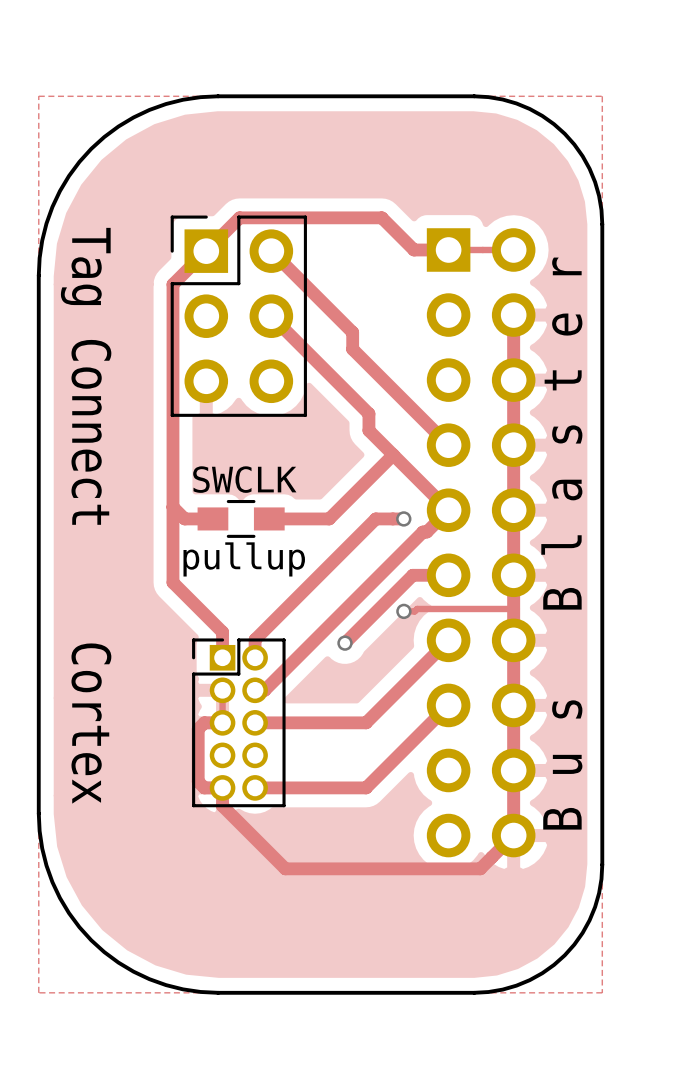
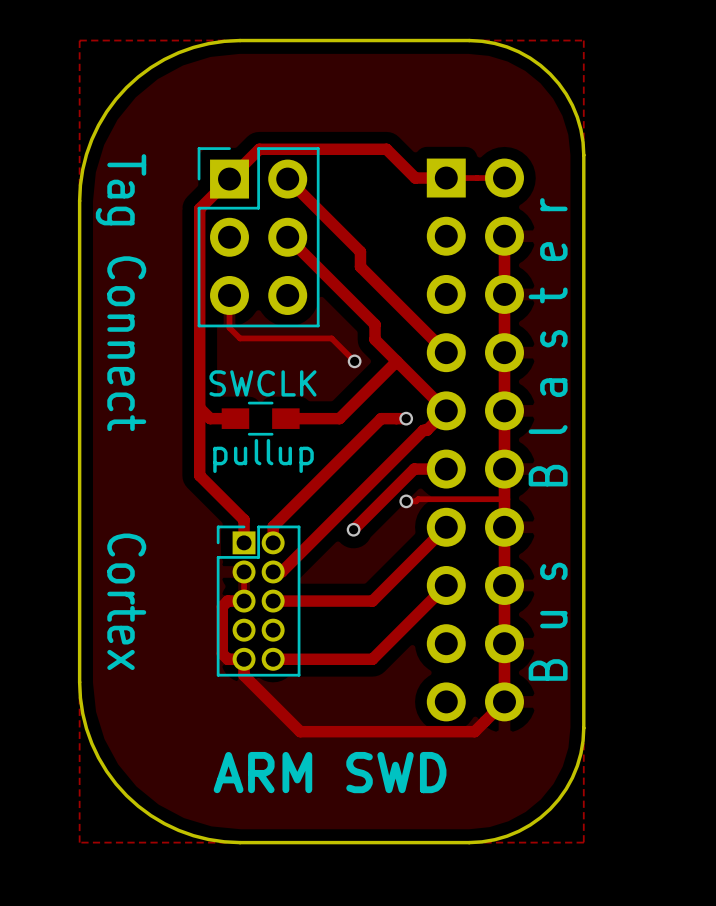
track: none -> (229, 295) (229, 327) (240, 338) (331, 338) (354, 361)
via: none -> (354, 361)
text: none -> ARM SWD (330, 772)

